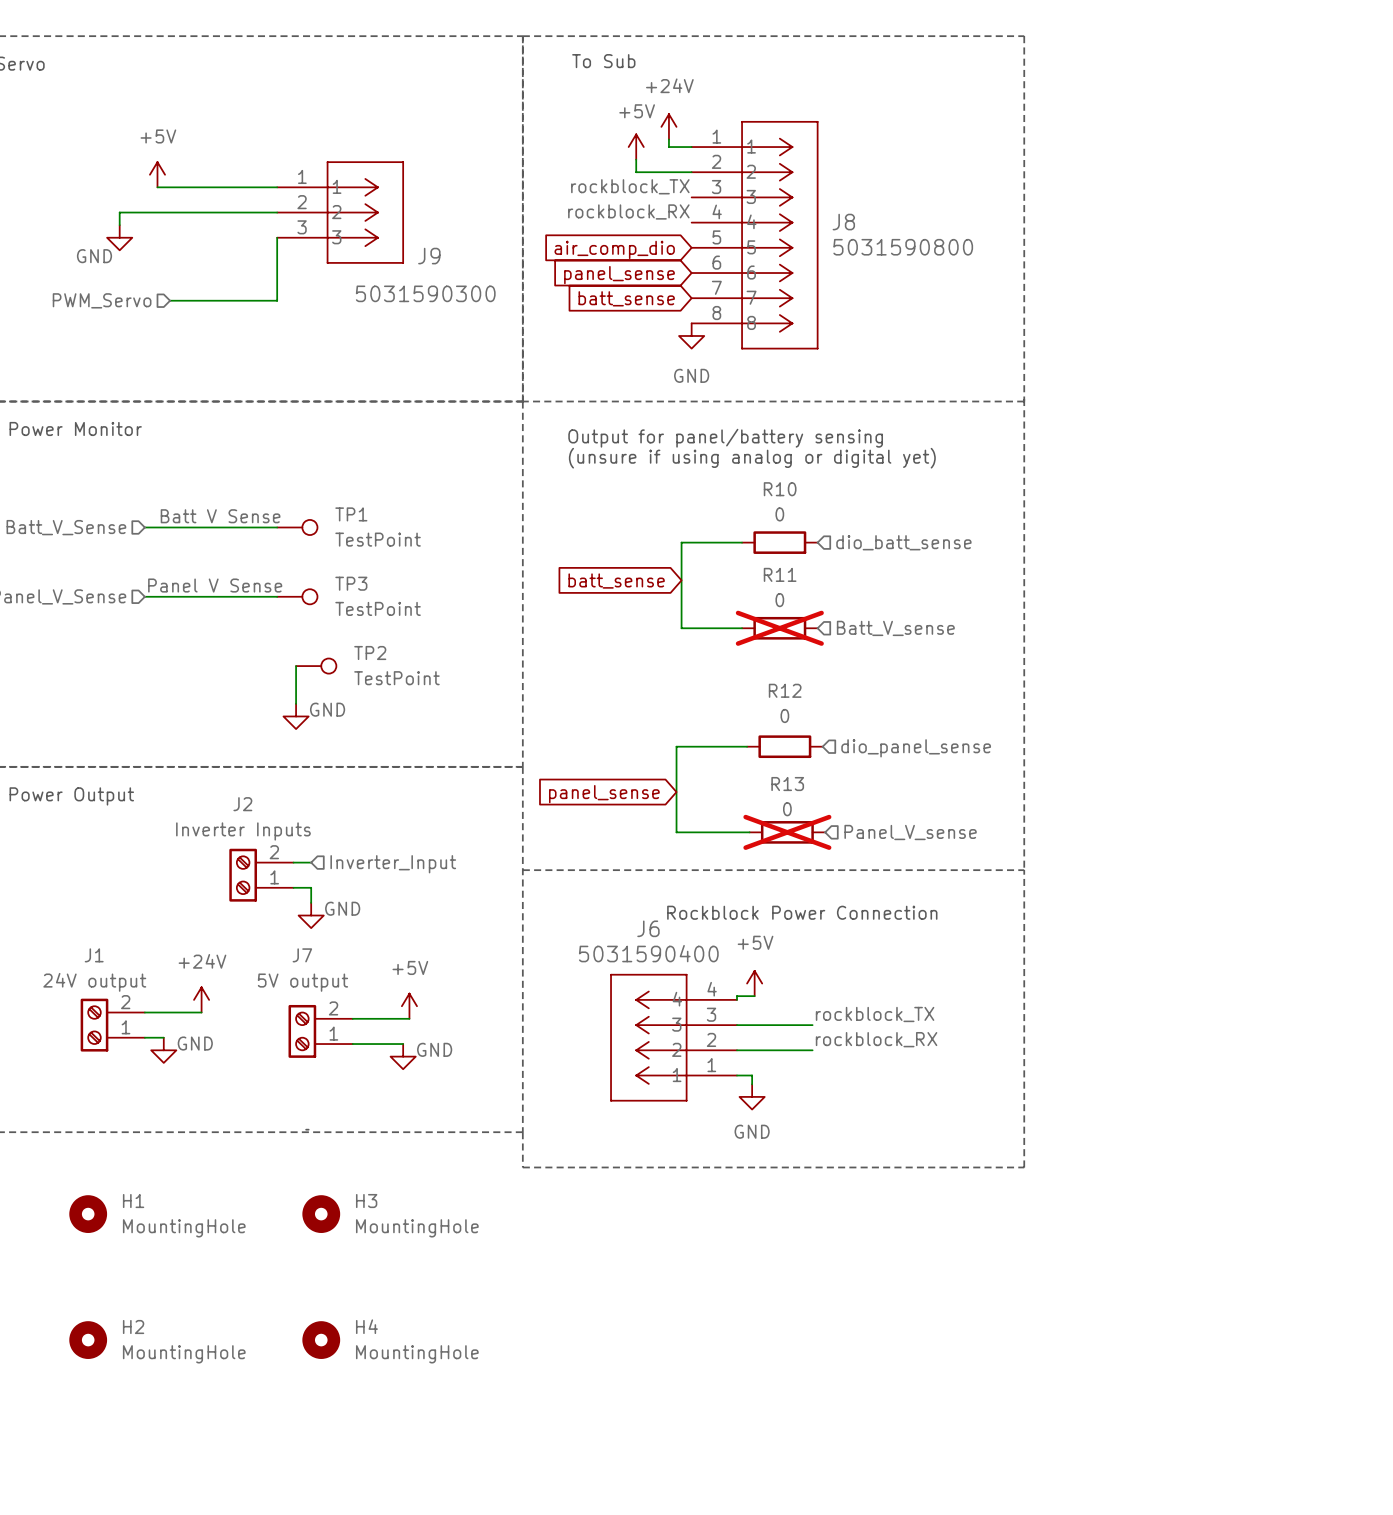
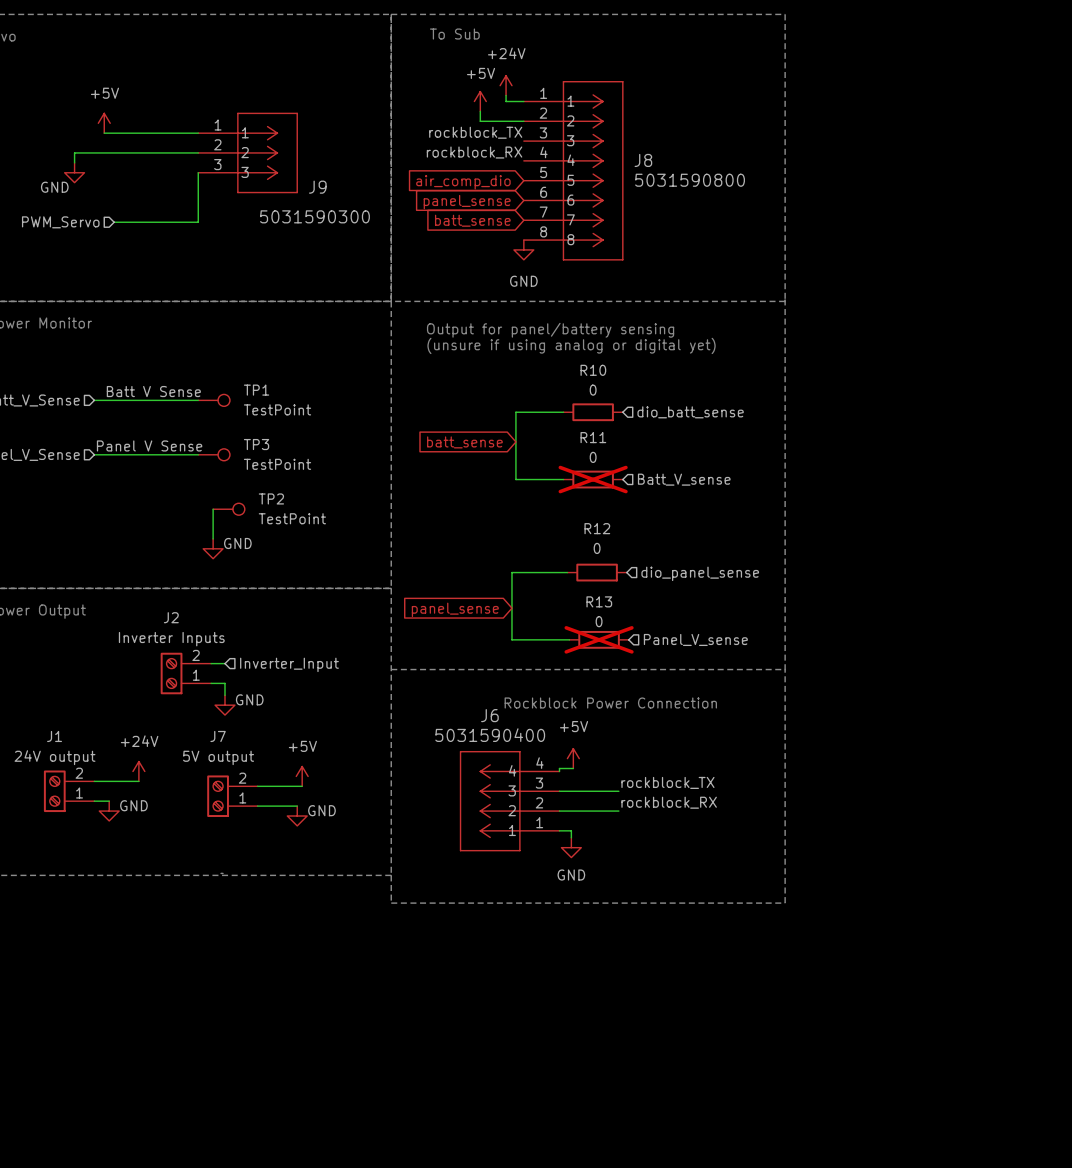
H1: MountingHole (88, 1214) -> none
H3: MountingHole (321, 1214) -> none
H2: MountingHole (88, 1340) -> none
H4: MountingHole (321, 1340) -> none

